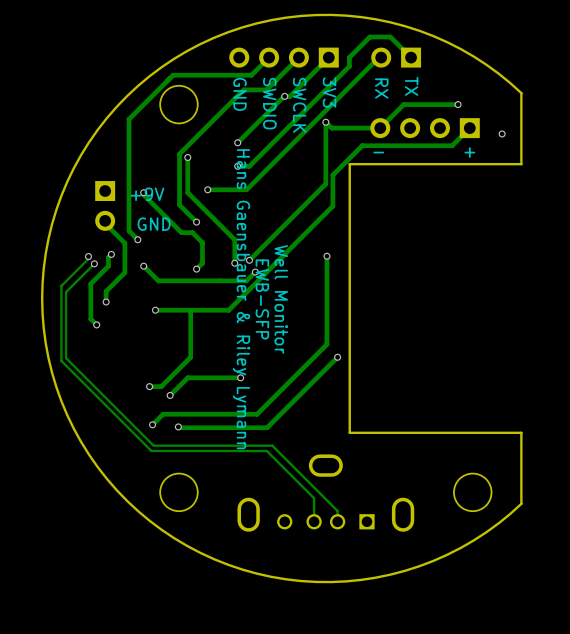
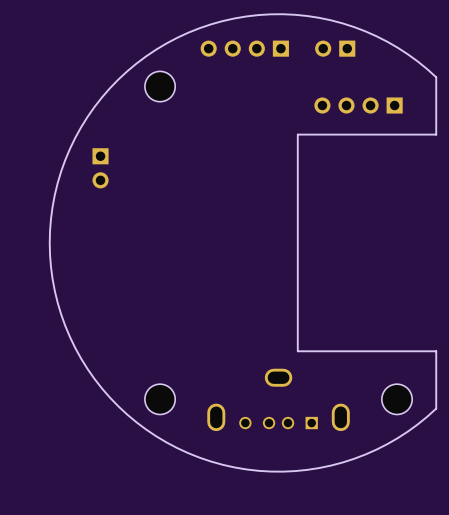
track: (269, 57) (251, 75) (173, 75) (129, 119) (129, 230) (137, 239) -> none
track: (298, 57) (266, 89) (243, 89) (179, 154) (179, 205) (196, 222) -> none
track: (328, 57) (290, 96) (284, 96) (237, 142) -> none
track: (381, 57) (378, 57) (246, 189) (207, 189) -> none
track: (411, 57) (390, 37) (369, 37) (349, 57) (349, 66) (249, 166) (237, 166) -> none
text: TX (411, 86) -> none
text: RX (381, 88) -> none
text: 3V3 (329, 92) -> none
text: GND (239, 94) -> none
via: (284, 96) -> none
text: SWDIO (269, 103) -> none
track: (458, 104) (403, 104) (380, 128) (331, 128) (325, 122) (325, 183) (249, 260) -> none
via: (458, 104) -> none
text: SWCLK (299, 105) -> none
via: (325, 122) -> none
track: (469, 128) (452, 145) (362, 145) (332, 175) (332, 206) (228, 310) (155, 310) -> none
via: (502, 133) -> none
via: (237, 142) -> none
text: - (378, 152) -> none
text: + (469, 152) -> none
track: (187, 157) (187, 192) (234, 239) (234, 263) -> none
via: (187, 157) -> none
via: (237, 166) -> none
via: (207, 189) -> none
track: (143, 192) (181, 232) (192, 232) (202, 242) (202, 263) (196, 269) -> none
via: (143, 192) -> none
text: +9V (147, 194) -> none
track: (105, 220) (105, 223) (124, 243) (124, 272) (106, 291) (106, 302) -> none
via: (196, 222) -> none
text: GND (154, 224) -> none
via: (137, 239) -> none
track: (111, 254) (108, 257) (108, 266) (90, 283) (90, 319) (96, 324) -> none
via: (111, 254) -> none
track: (88, 256) (88, 258) (61, 285) (61, 360) (151, 450) (266, 450) (314, 498) (314, 521) -> none
via: (88, 256) -> none
track: (326, 256) (326, 344) (257, 414) (163, 414) (152, 424) -> none
via: (326, 256) -> none
via: (249, 260) -> none
track: (94, 263) (66, 292) (66, 358) (153, 445) (272, 445) (337, 510) (337, 521) -> none
via: (94, 263) -> none
via: (234, 263) -> none
track: (143, 266) (158, 280) (246, 280) (255, 272) -> none
via: (143, 266) -> none
via: (196, 269) -> none
via: (255, 272) -> none
text: Hans Gaensbauer & Riley Lymann (241, 299) -> none
text: EWB-SFP (262, 299) -> none
text: Well Monitor (281, 299) -> none
via: (106, 302) -> none
via: (155, 310) -> none
track: (190, 310) (190, 357) (161, 386) (149, 386) -> none
via: (96, 324) -> none
track: (337, 357) (267, 427) (178, 426) -> none
via: (337, 357) -> none
track: (240, 377) (187, 377) (170, 395) -> none
via: (240, 377) -> none
via: (149, 386) -> none
via: (170, 395) -> none
via: (152, 424) -> none
via: (178, 426) -> none

